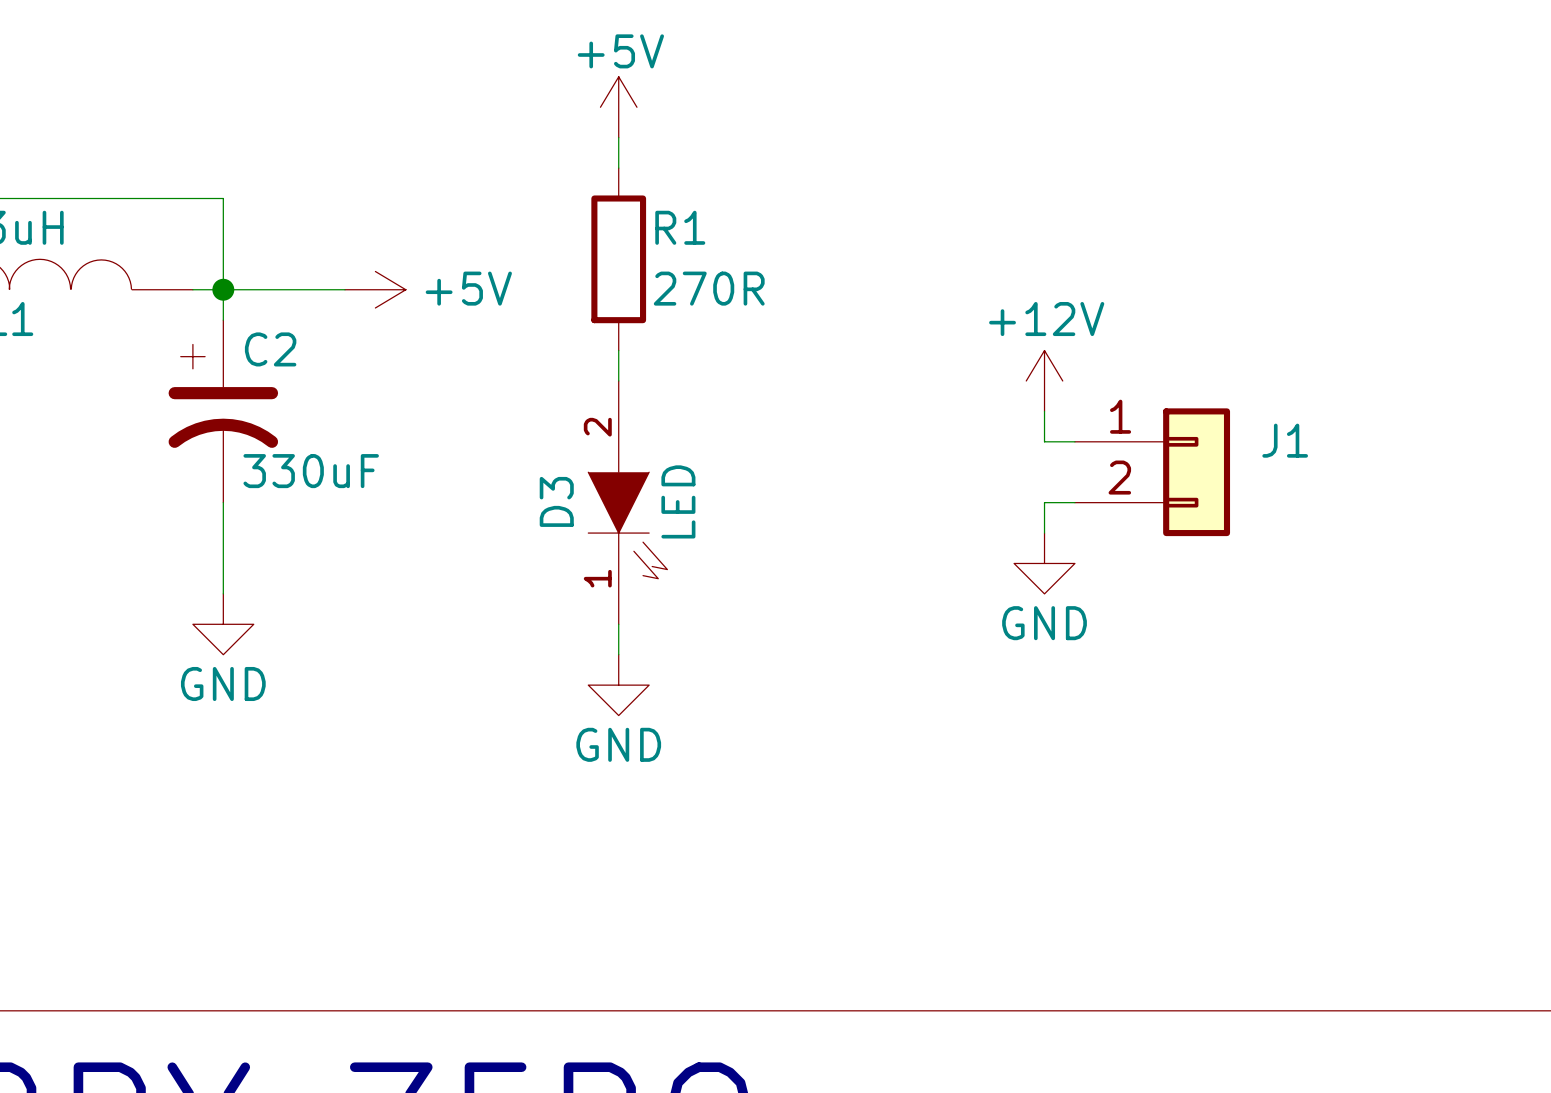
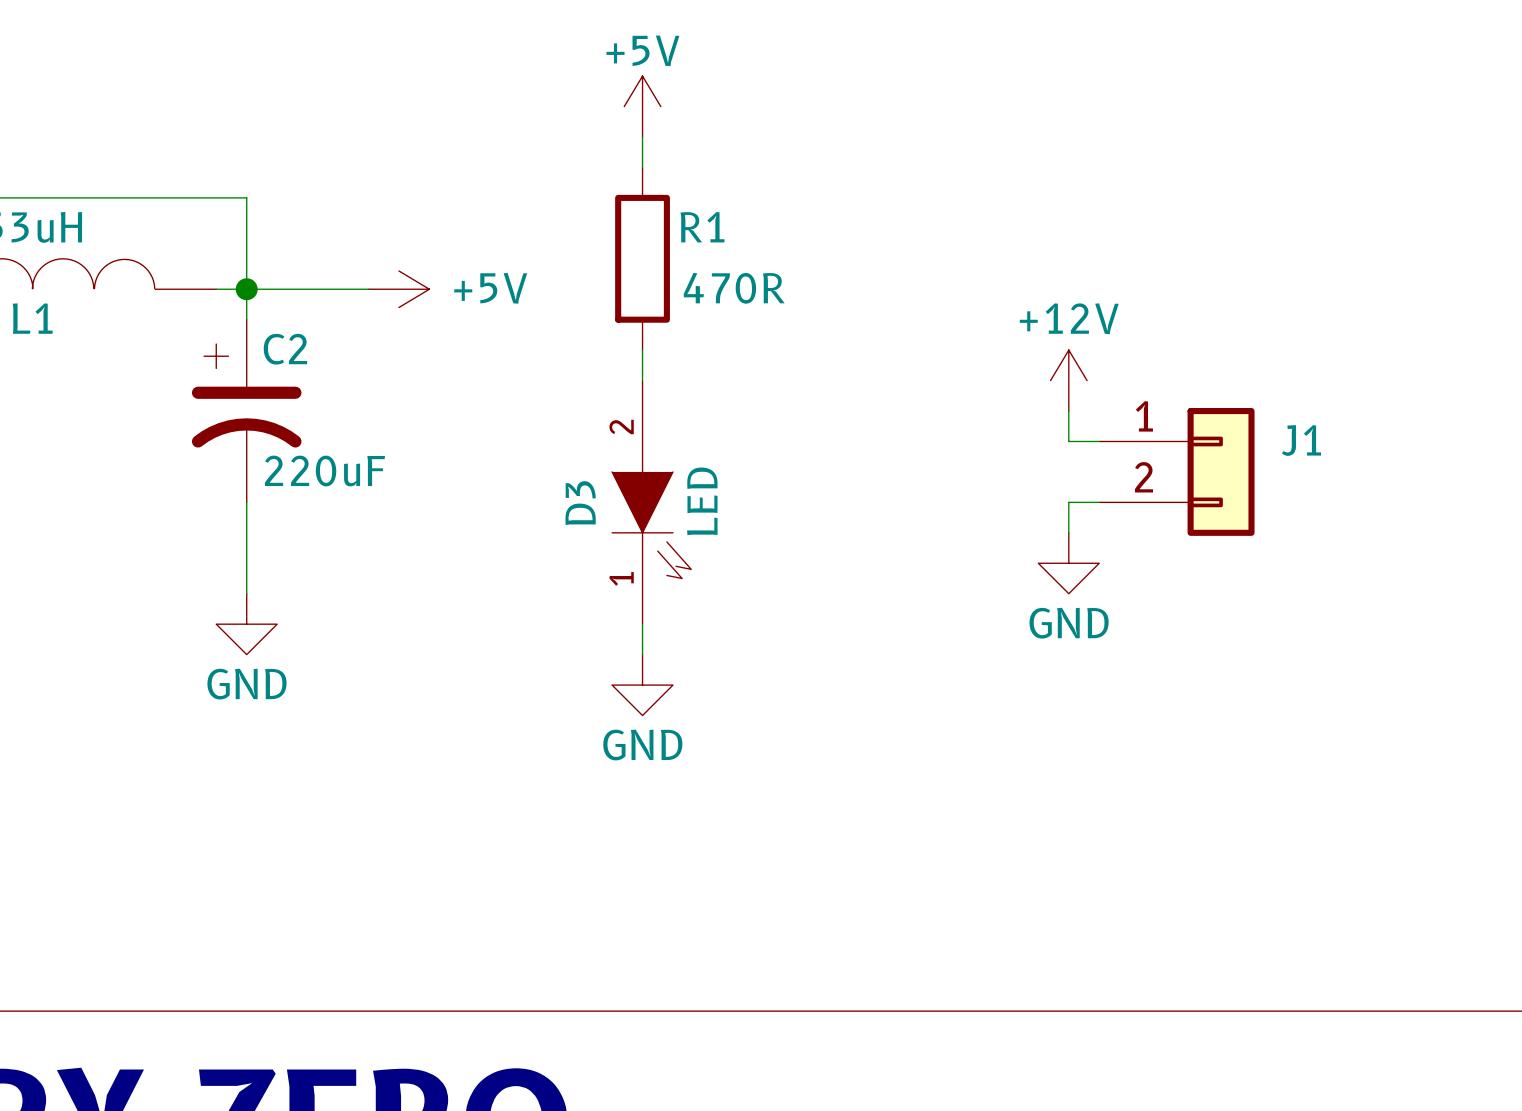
R1 value: 270R (709, 288) -> 470R (734, 288)
C2 value: 330uF (311, 471) -> 220uF (325, 470)

